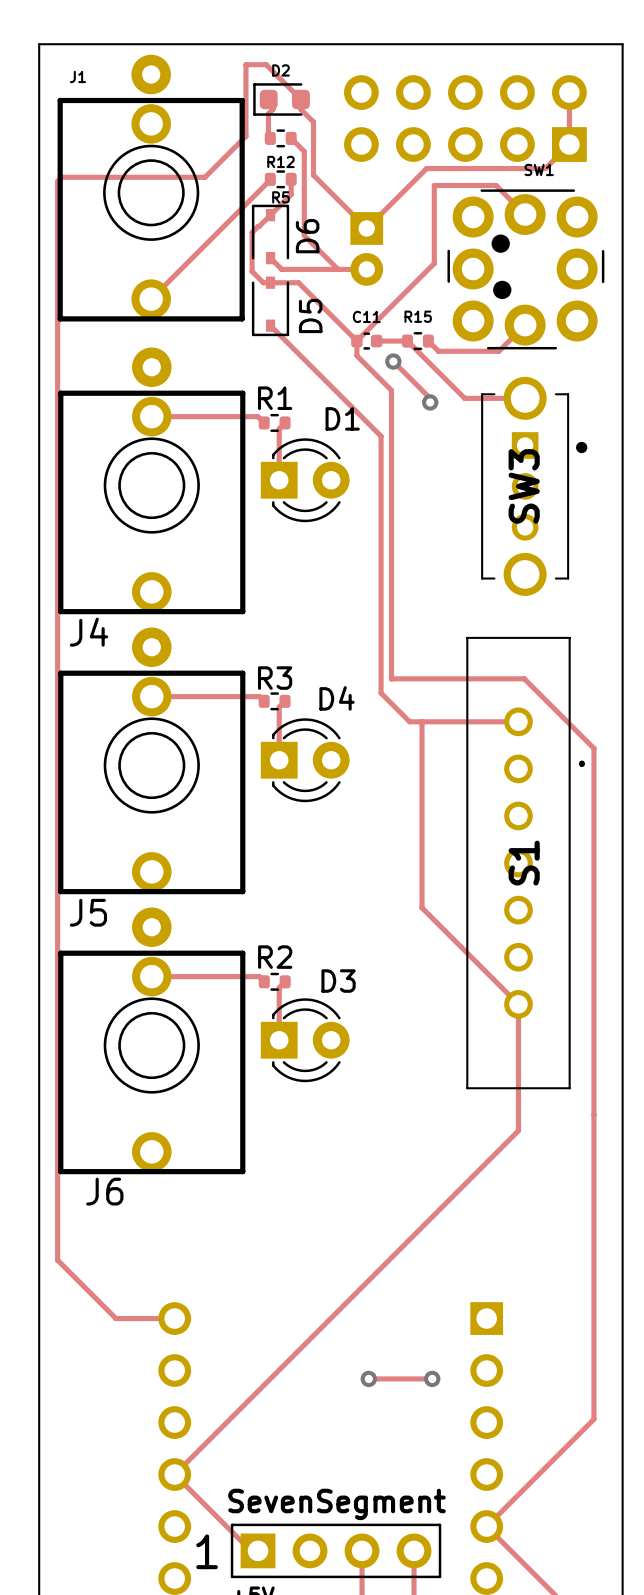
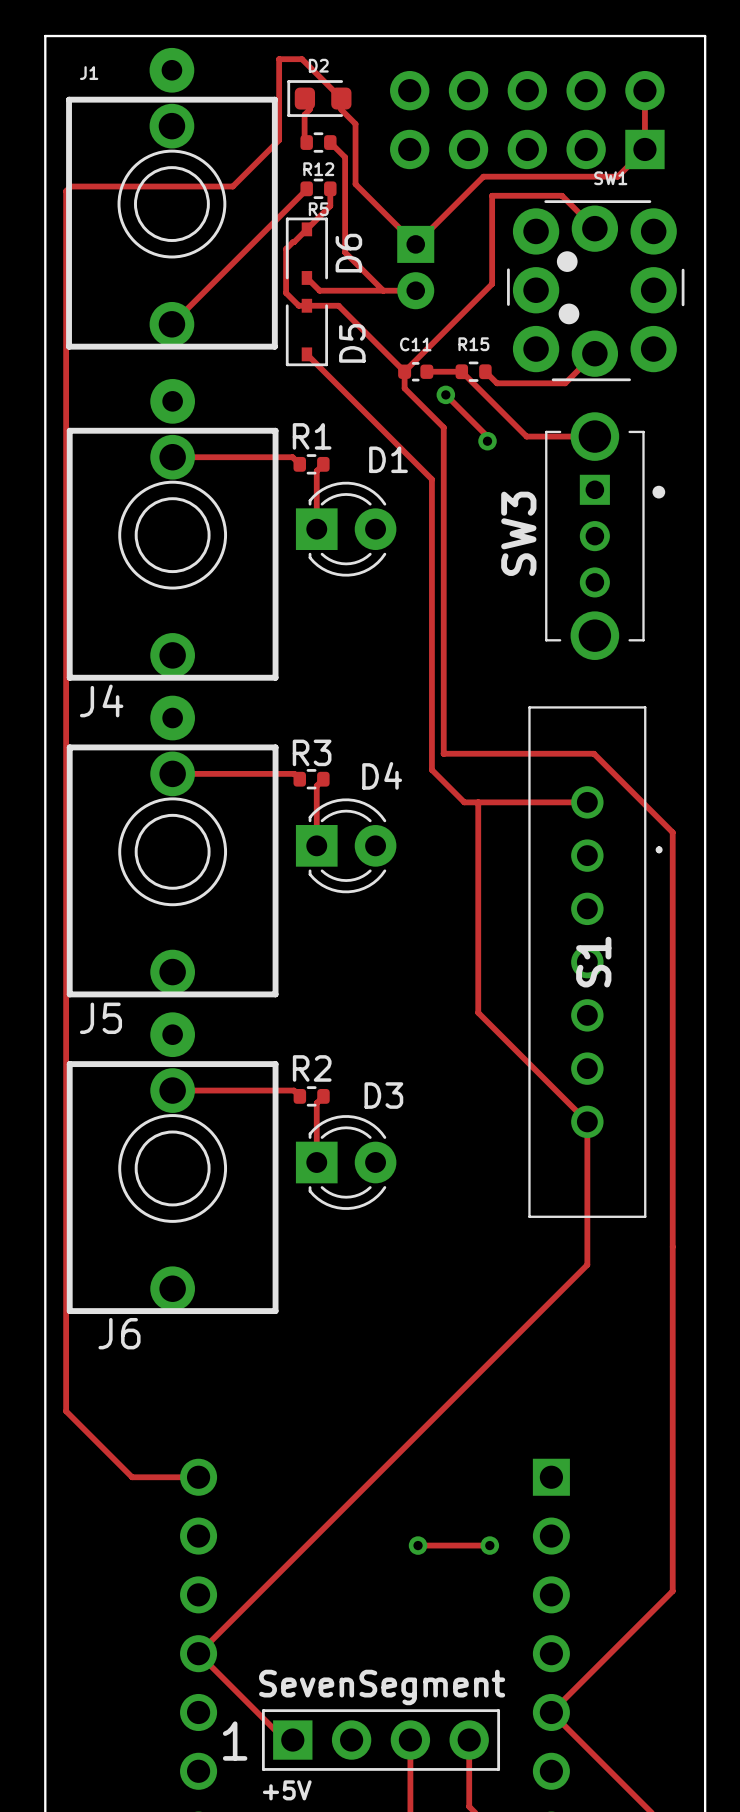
SW3 name position: SW3 (524, 486) -> SW3 (518, 533)

